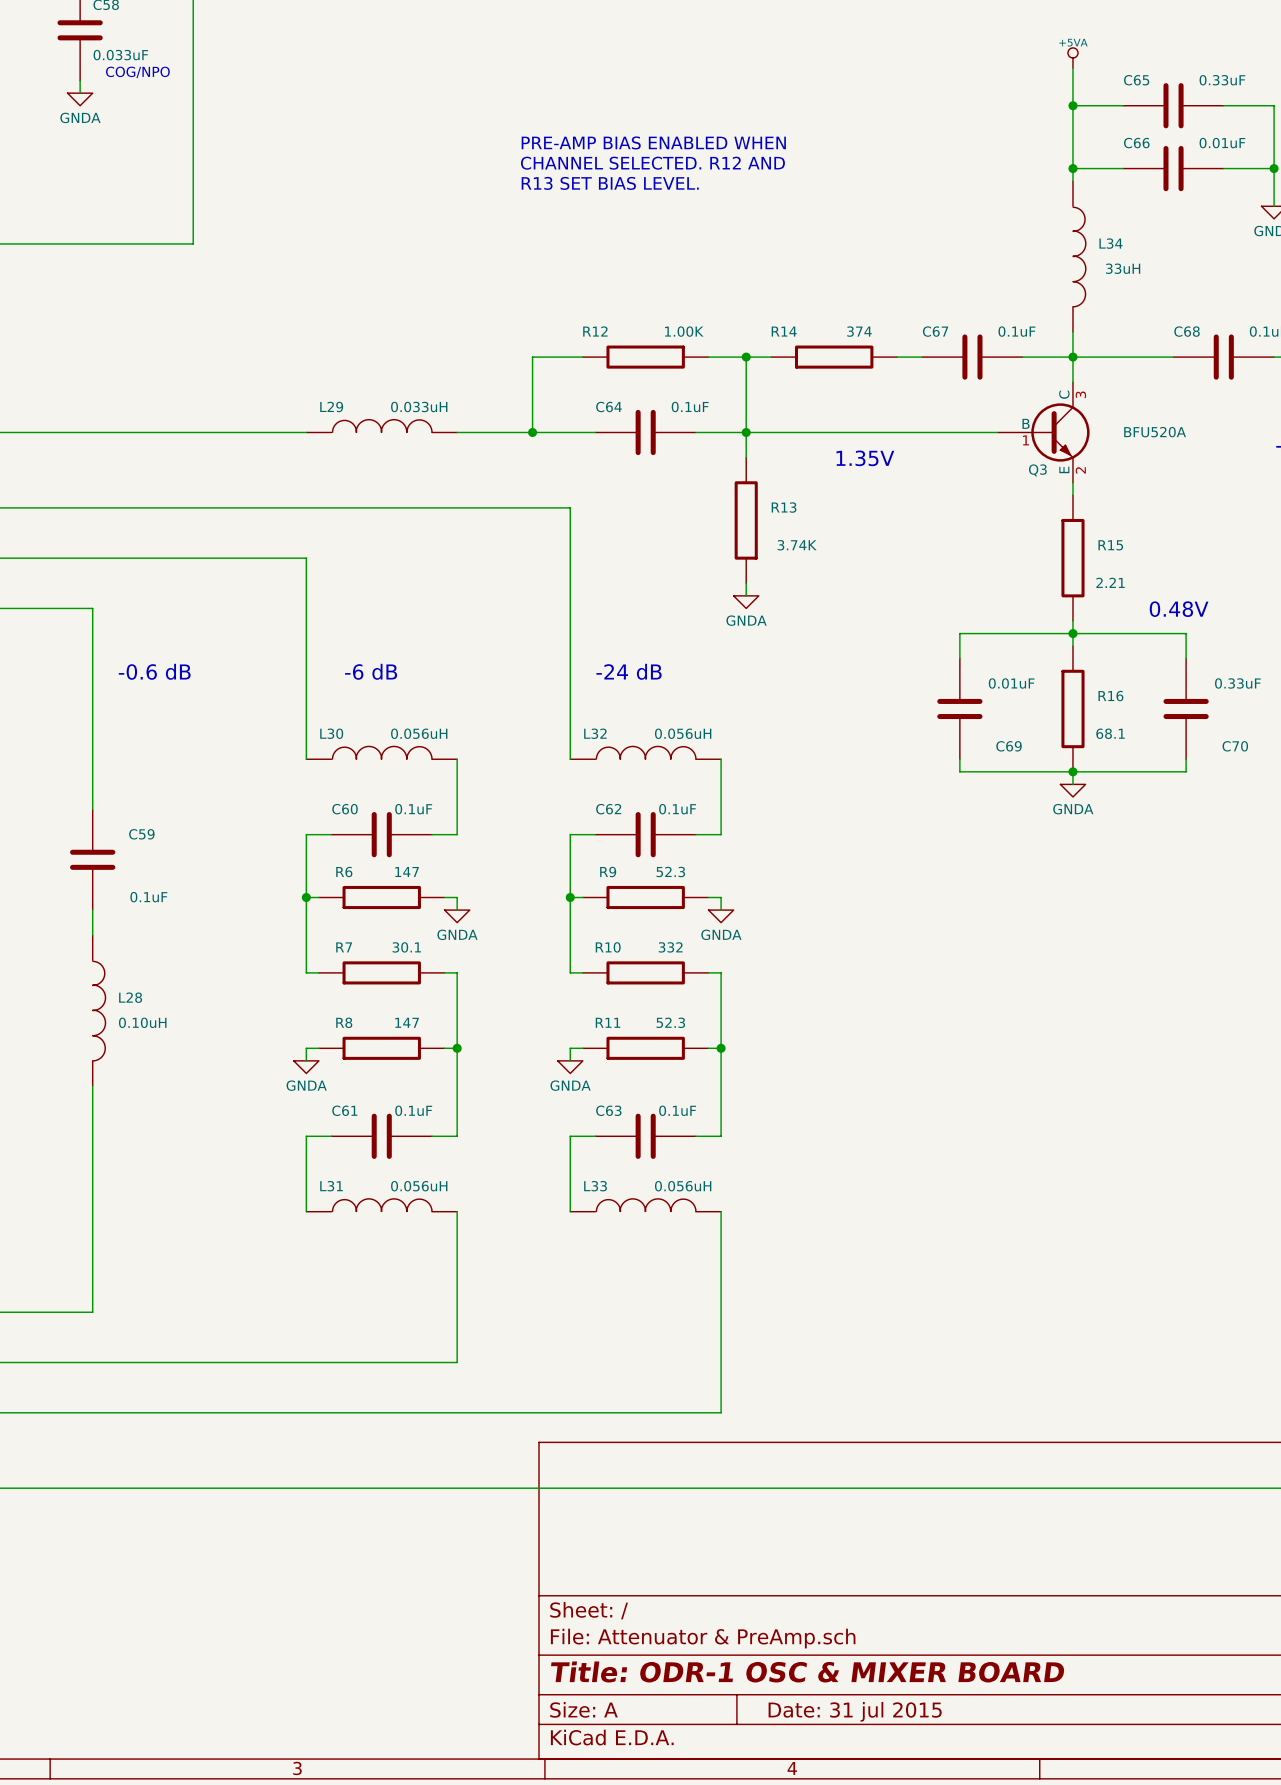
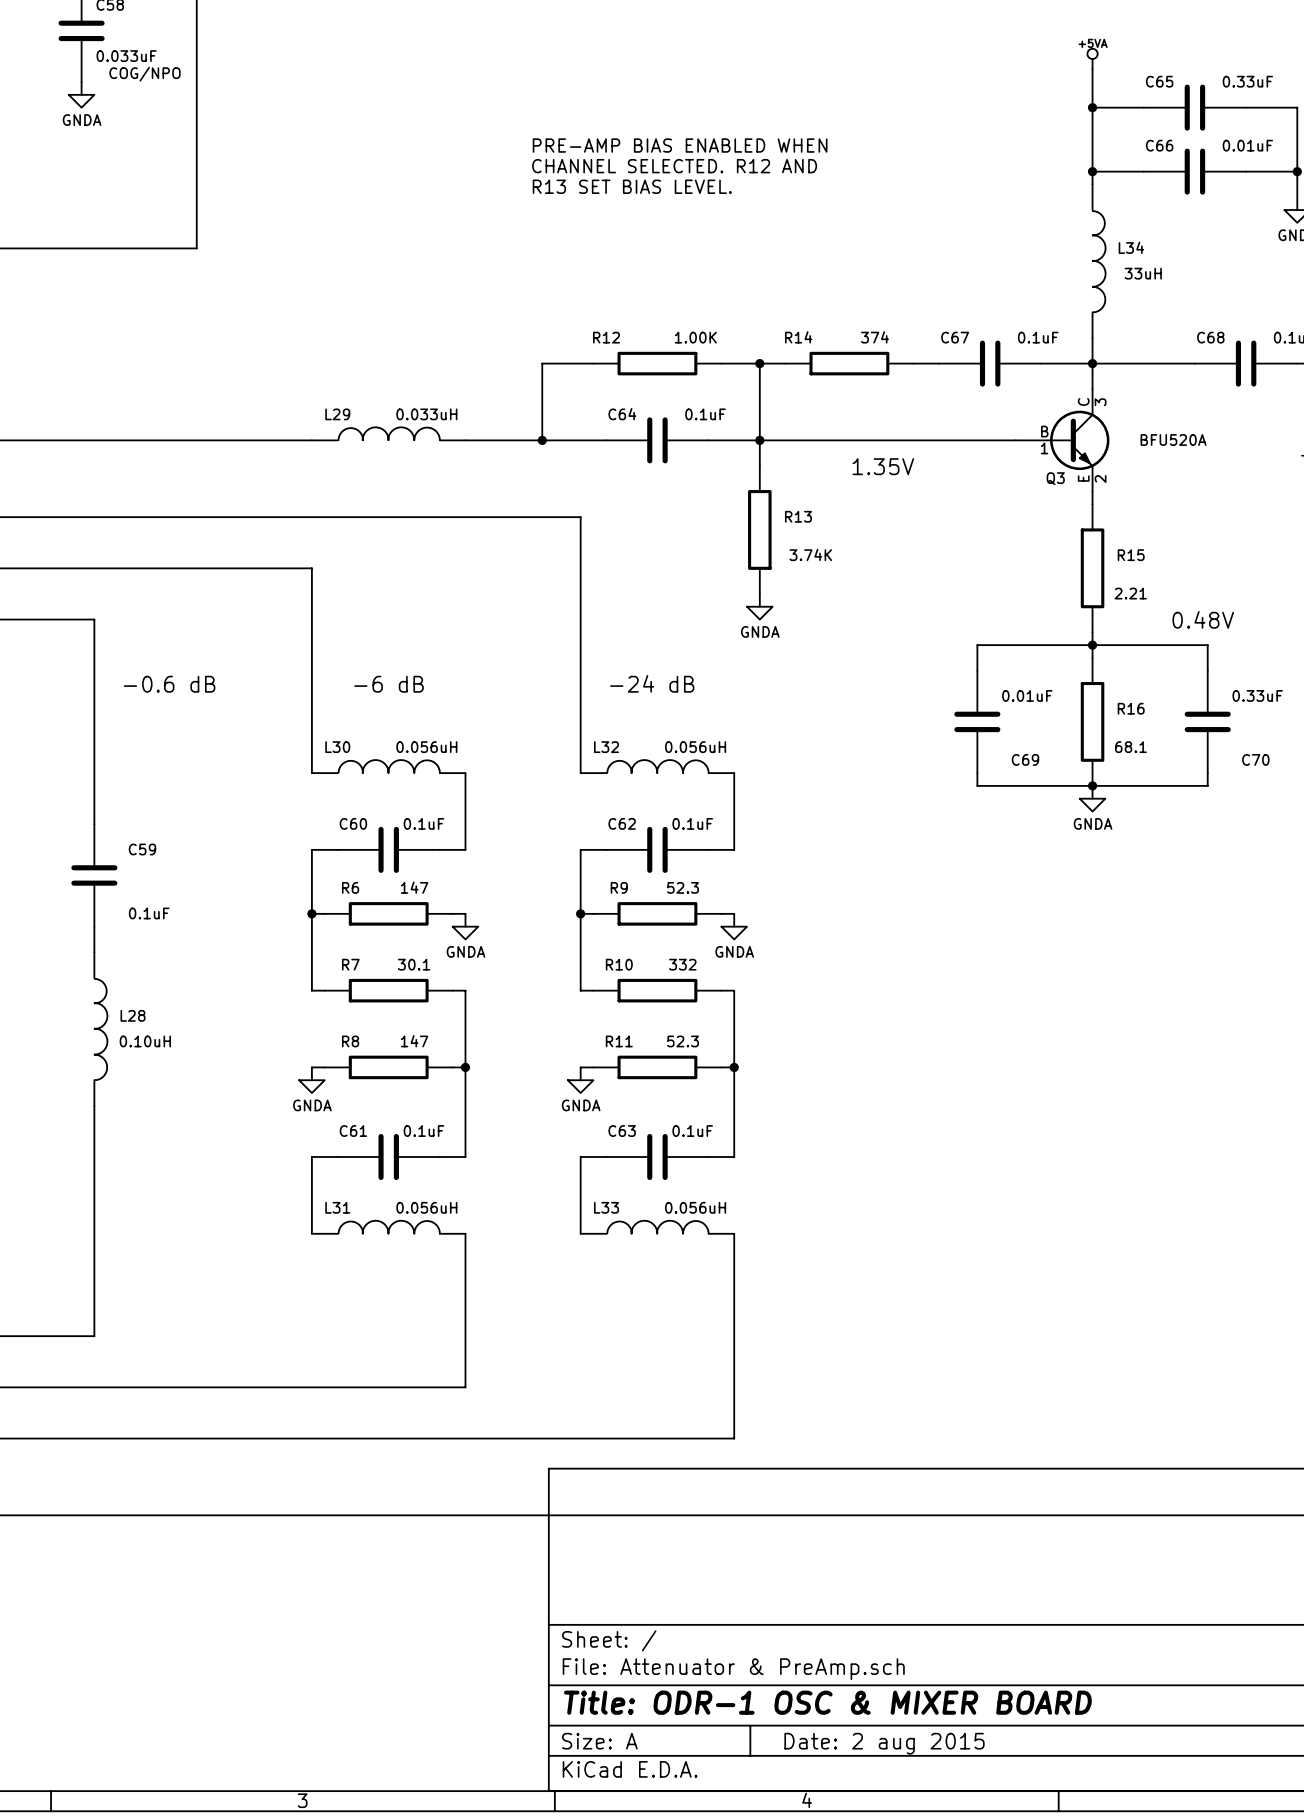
title block: Date: 31 jul 2015 (855, 1711) -> Date: 2 aug 2015 (884, 1743)

